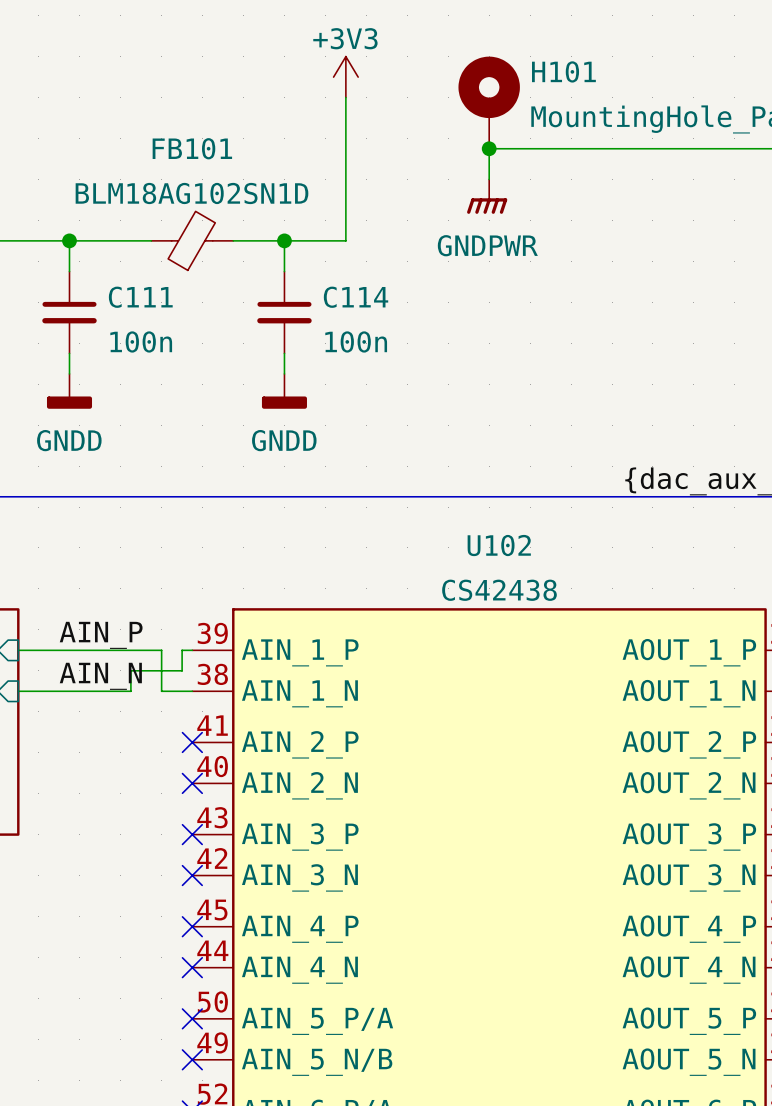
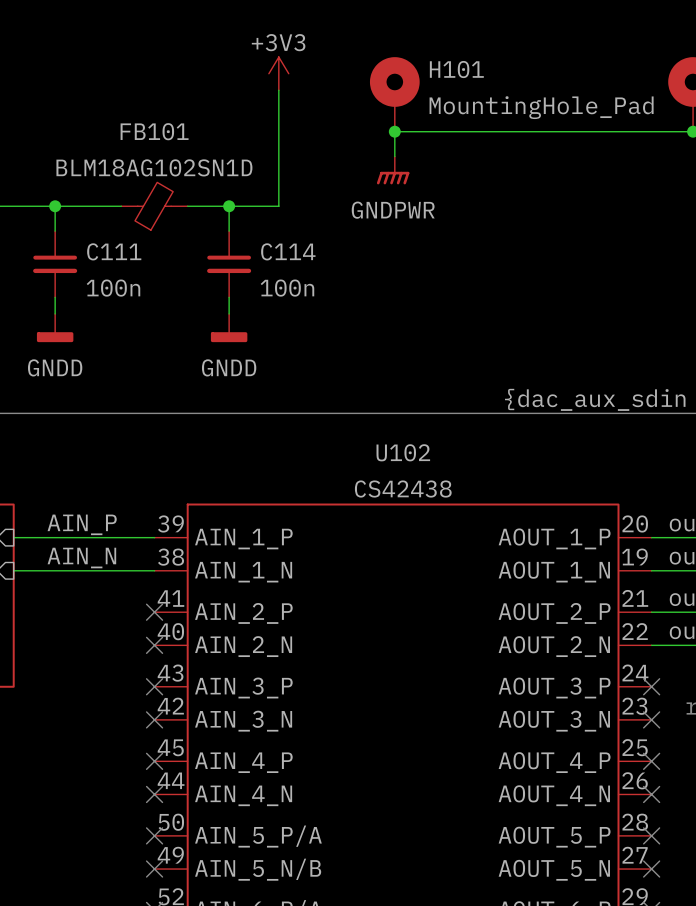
wire: (161, 650) (161, 691) -> (129, 537) (146, 537)
wire: (182, 650) (182, 670) (130, 670) (130, 691) -> (129, 570) (104, 570)

